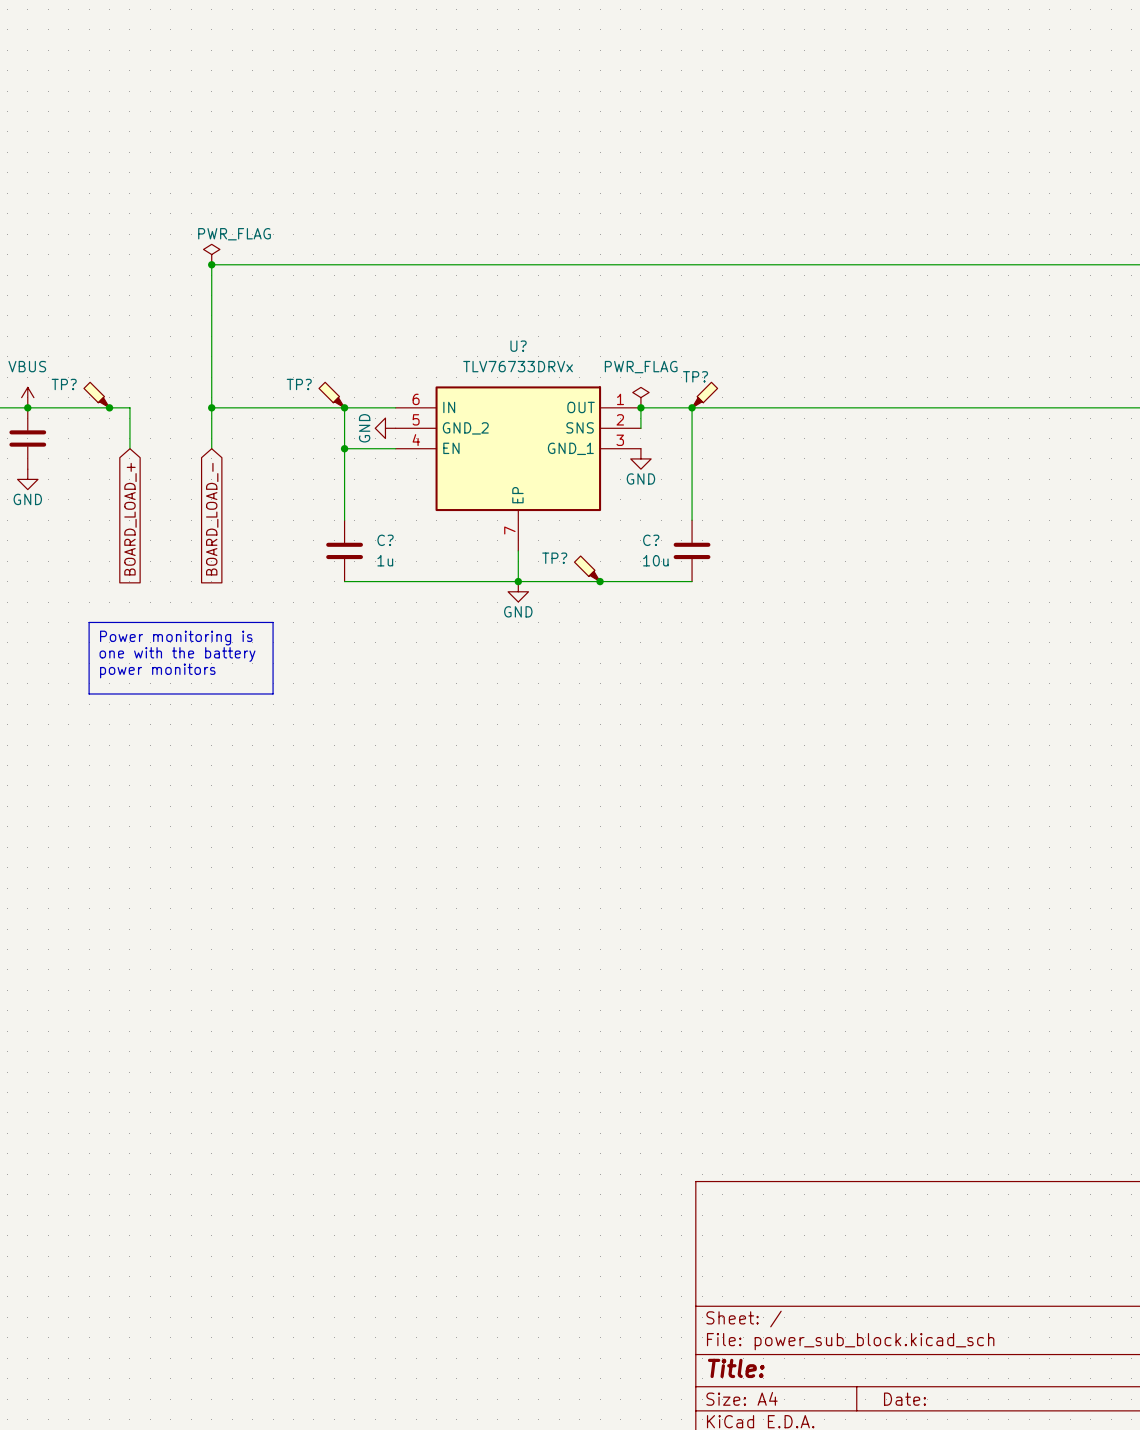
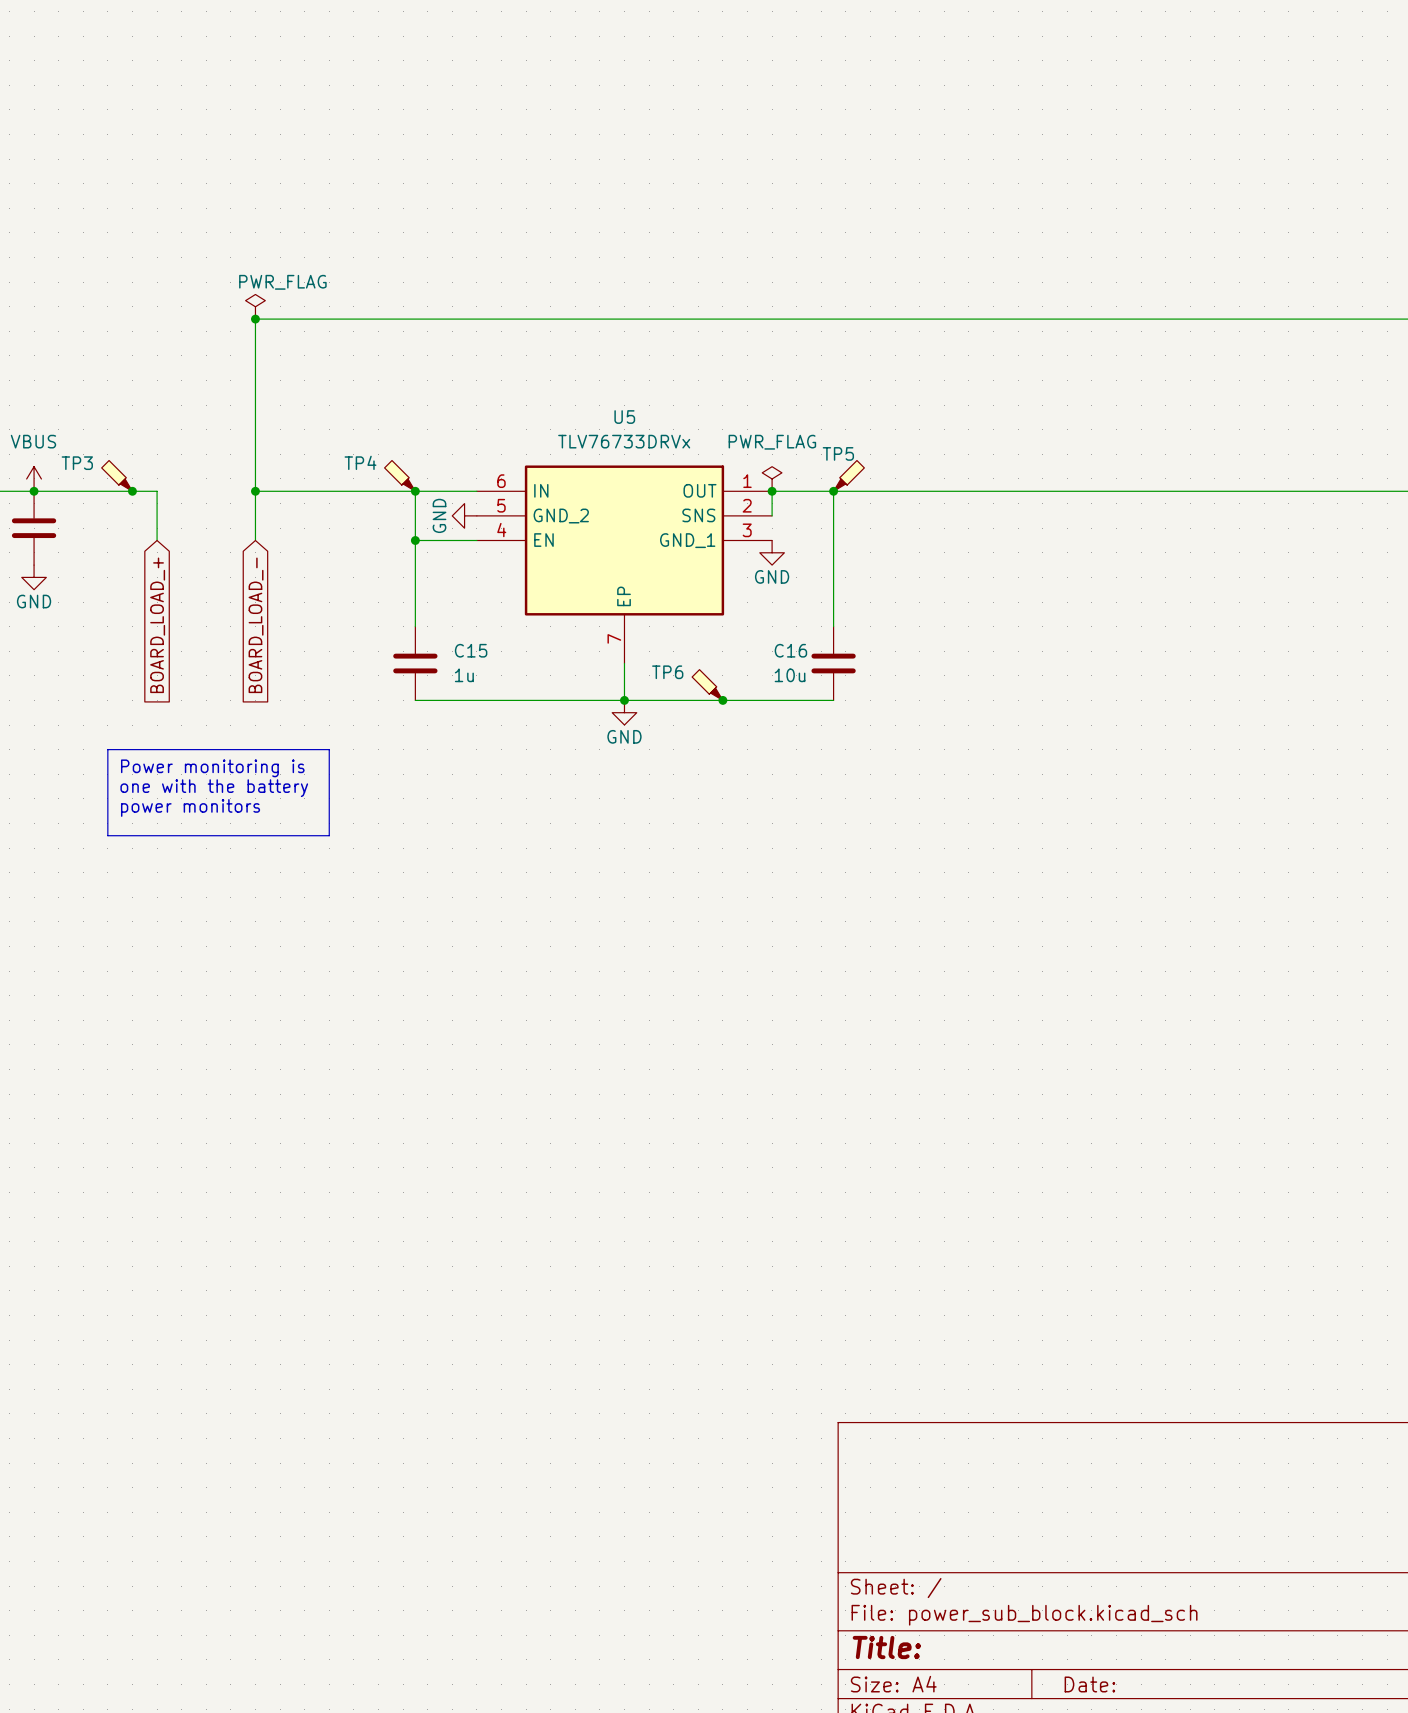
U? name: U? (518, 346) -> U5 (624, 417)
TP? name: TP? (695, 376) -> TP5 (838, 453)
TP? name: TP? (64, 384) -> TP3 (77, 463)
TP? name: TP? (299, 384) -> TP4 (360, 462)
C? name: C? (385, 540) -> C15 (471, 650)
C? name: C? (651, 540) -> C16 (790, 650)
TP? name: TP? (554, 558) -> TP6 (667, 672)

